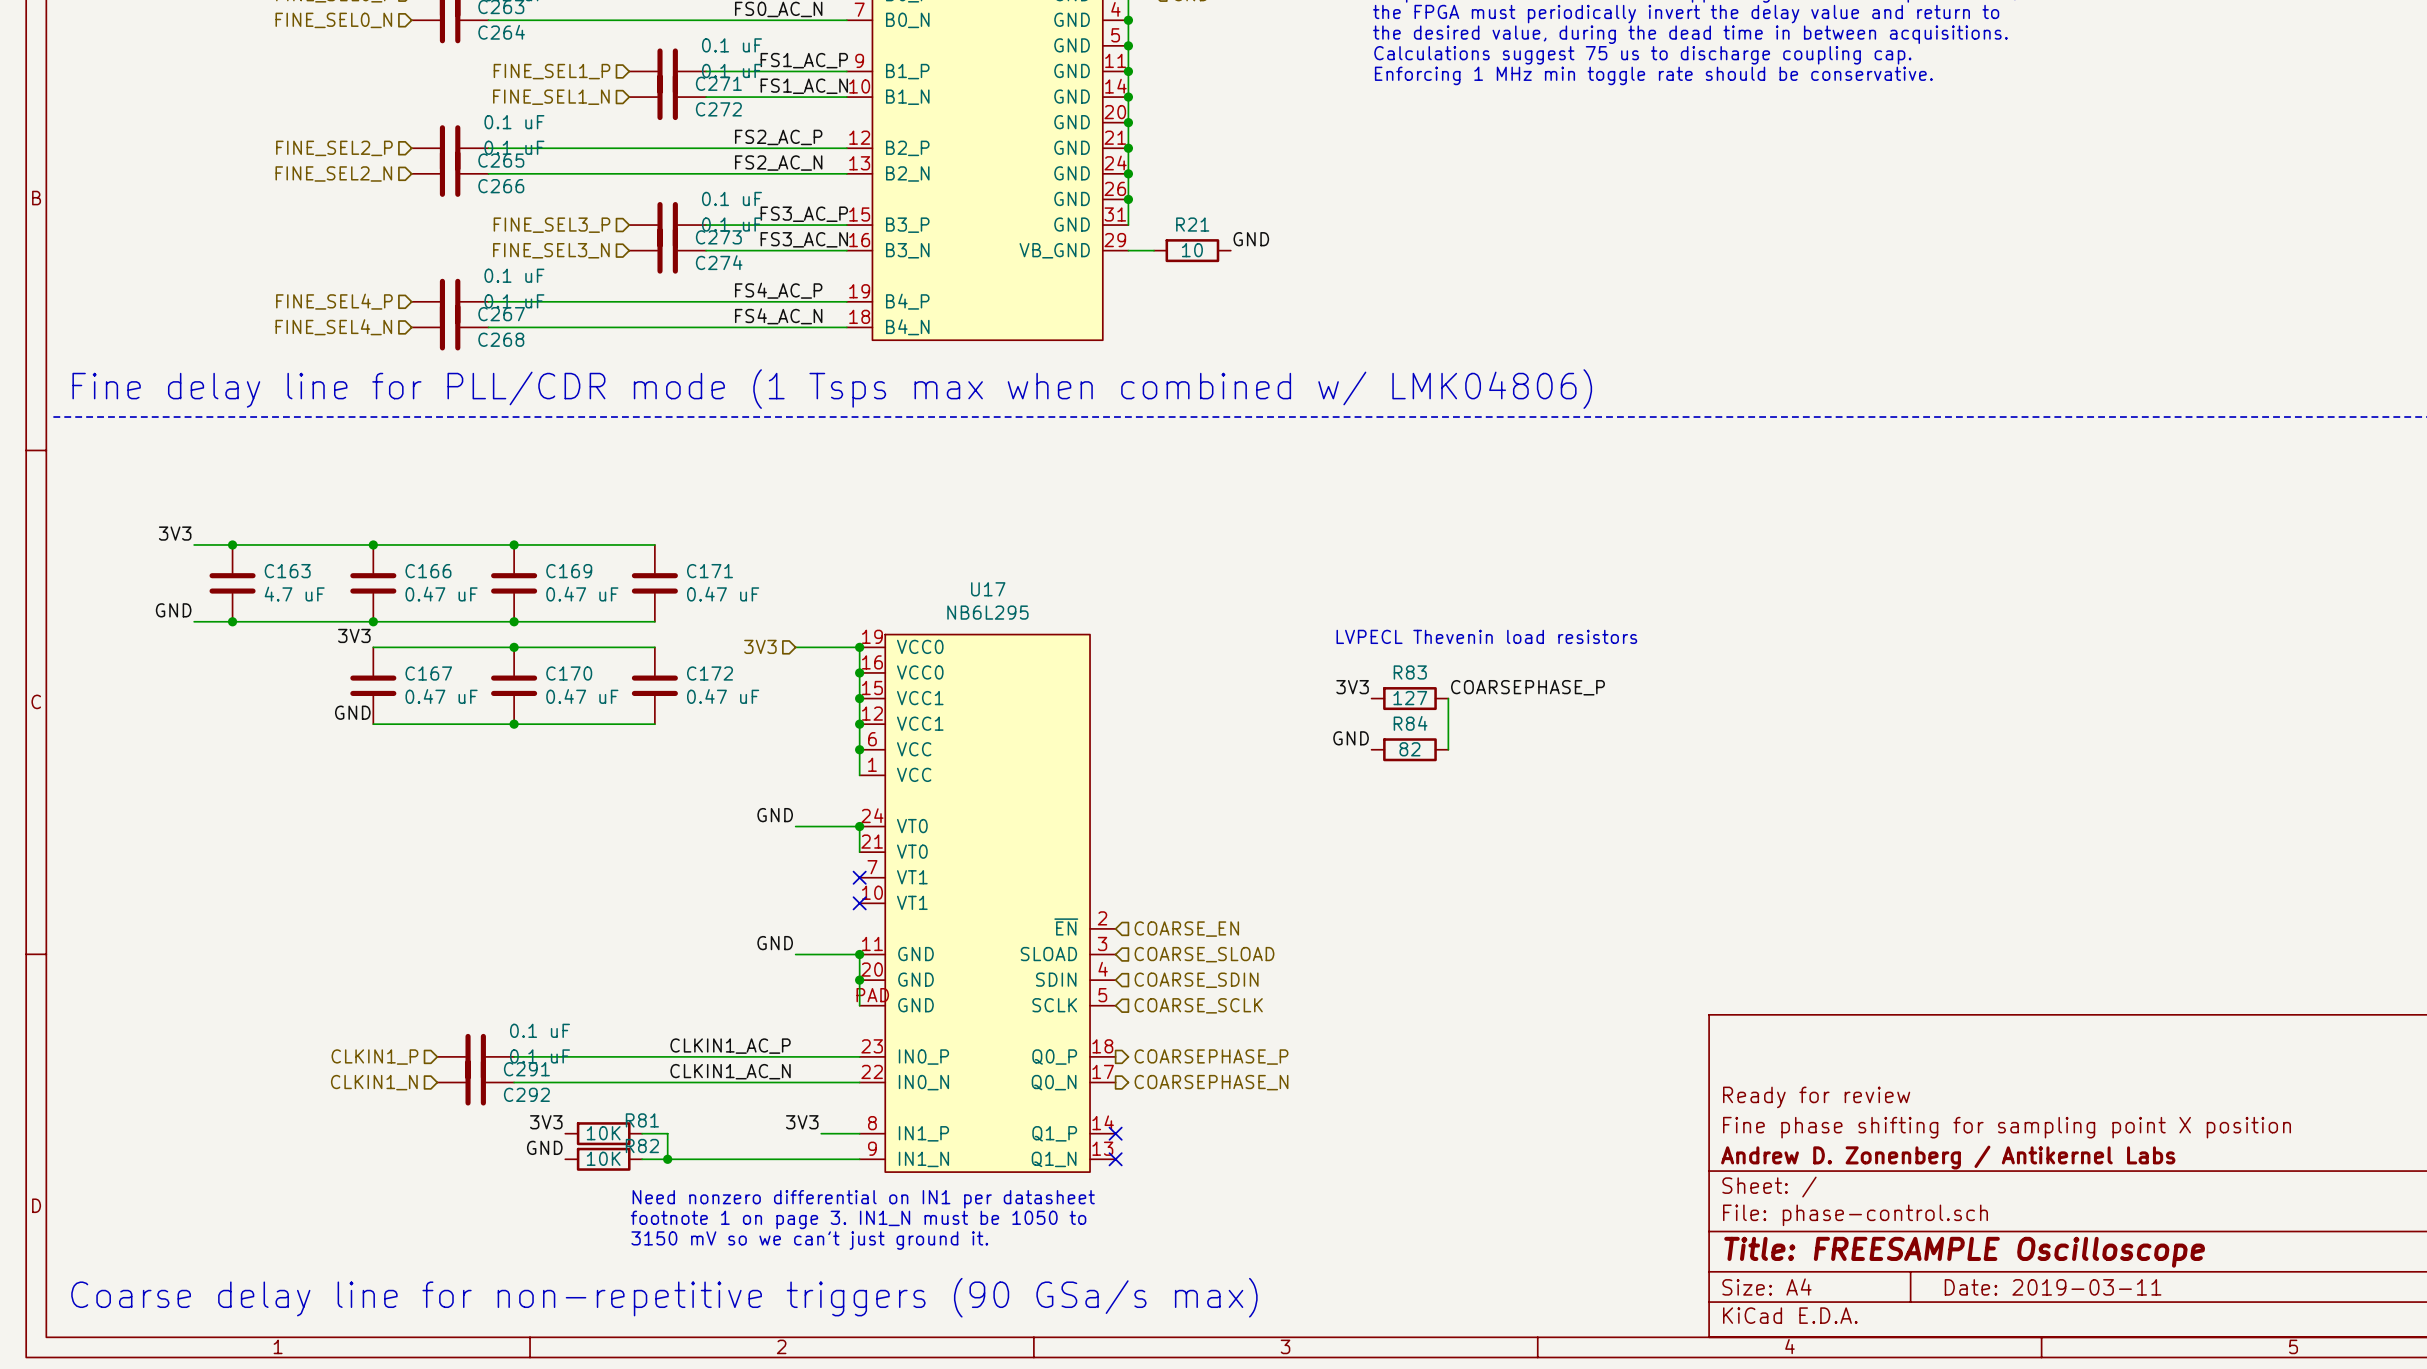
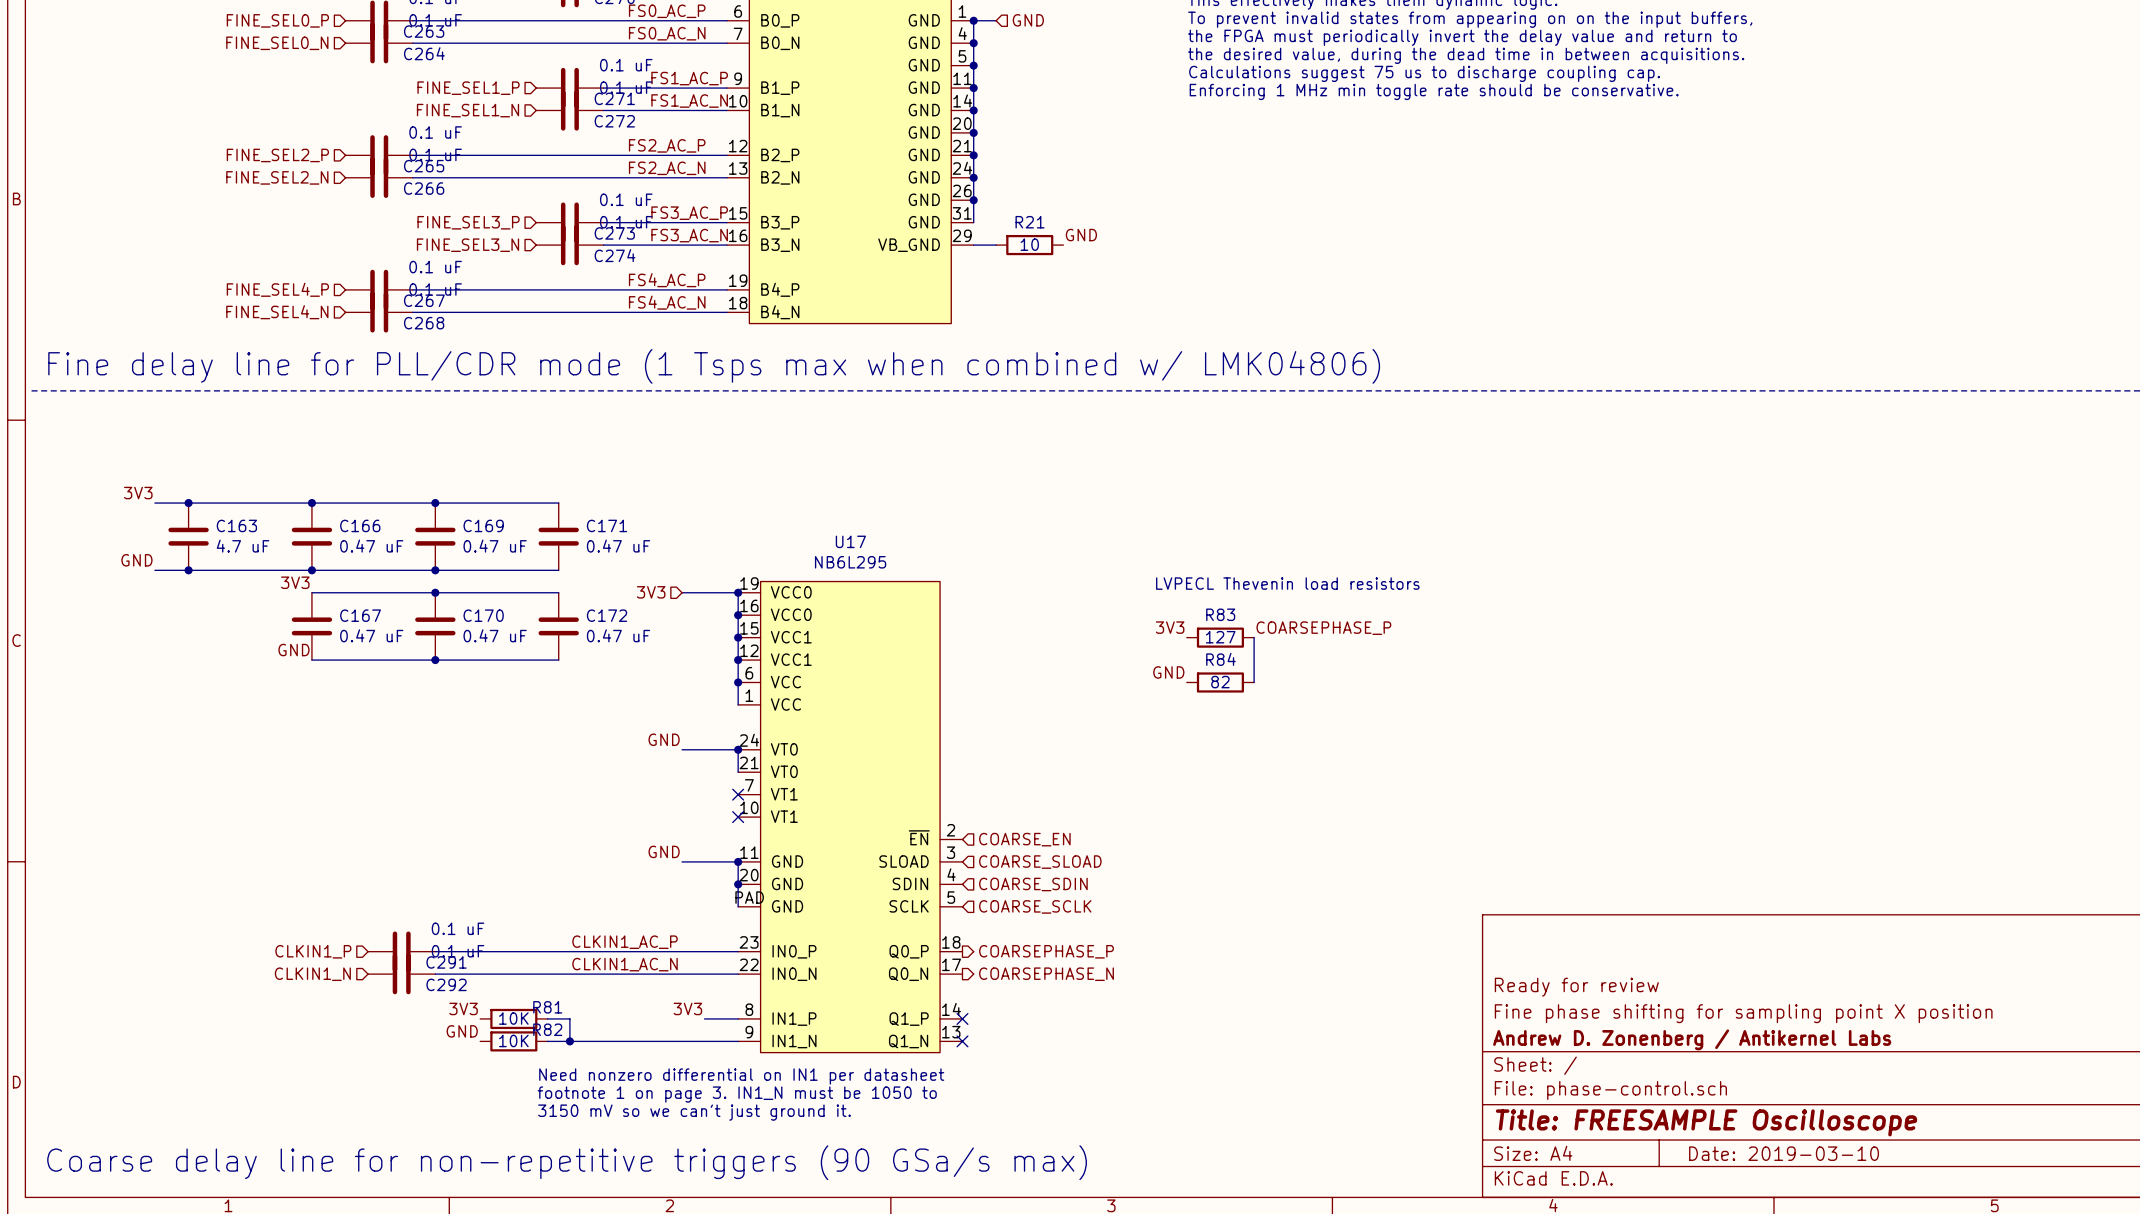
title block: Date: 2019-03-11 (2053, 1287) -> Date: 2019-03-10 (1784, 1153)

